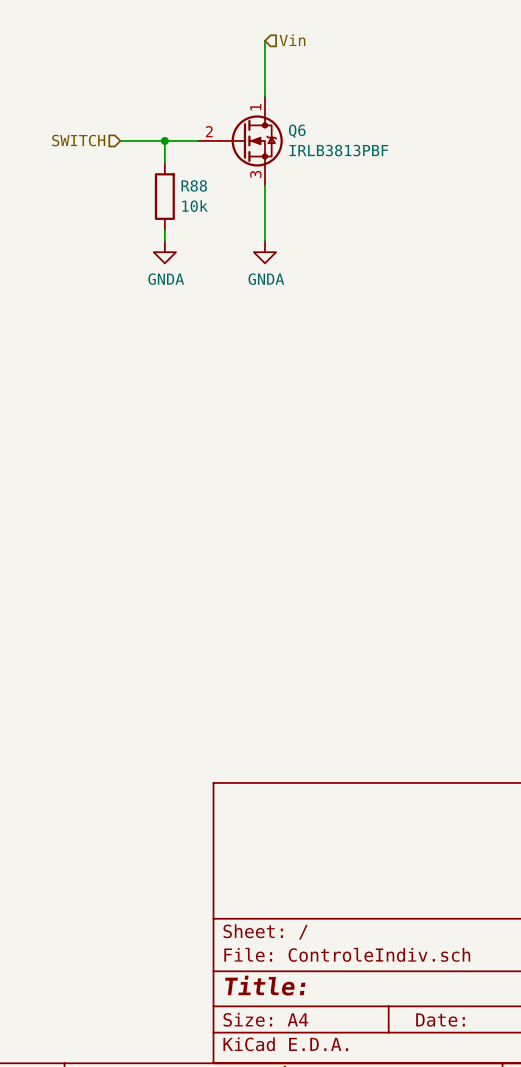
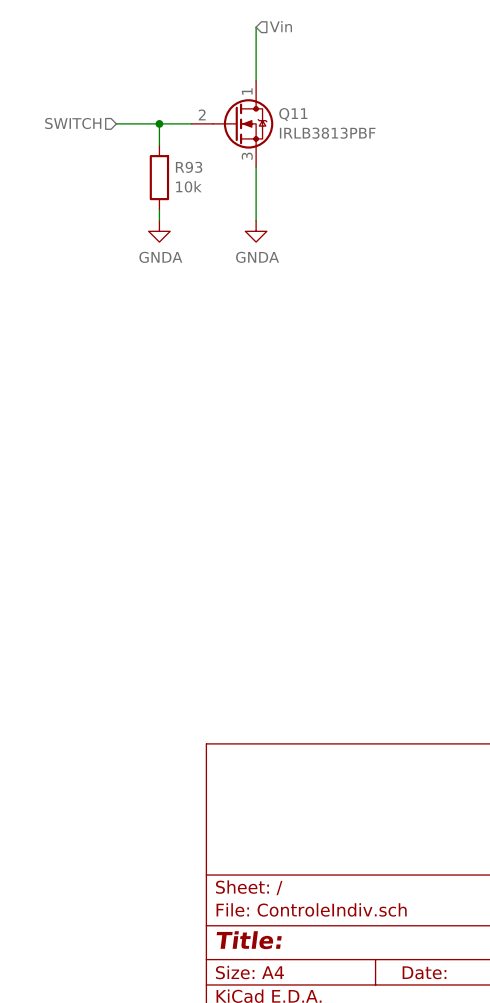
Q6 name: Q6 (297, 131) -> Q11 (293, 114)
R88 name: R88 (194, 185) -> R93 (189, 167)

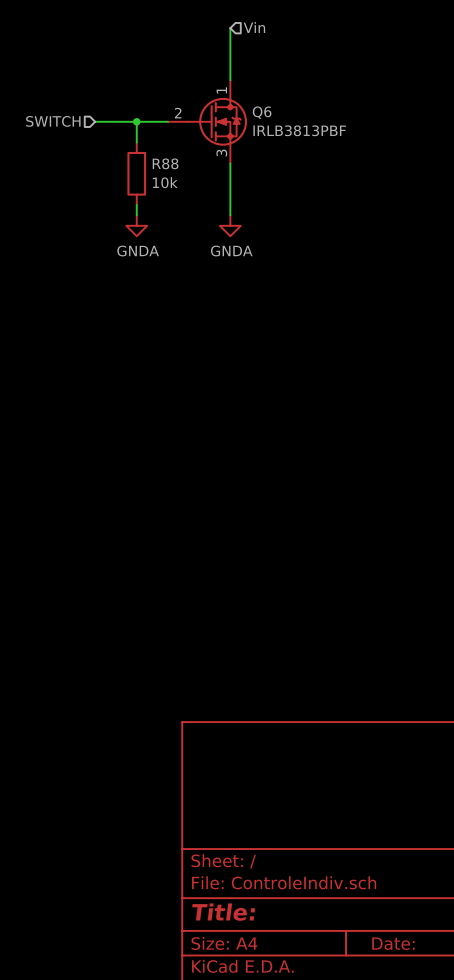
Q11 name: Q11 (293, 114) -> Q6 (262, 112)
R93 name: R93 (189, 167) -> R88 (165, 163)

